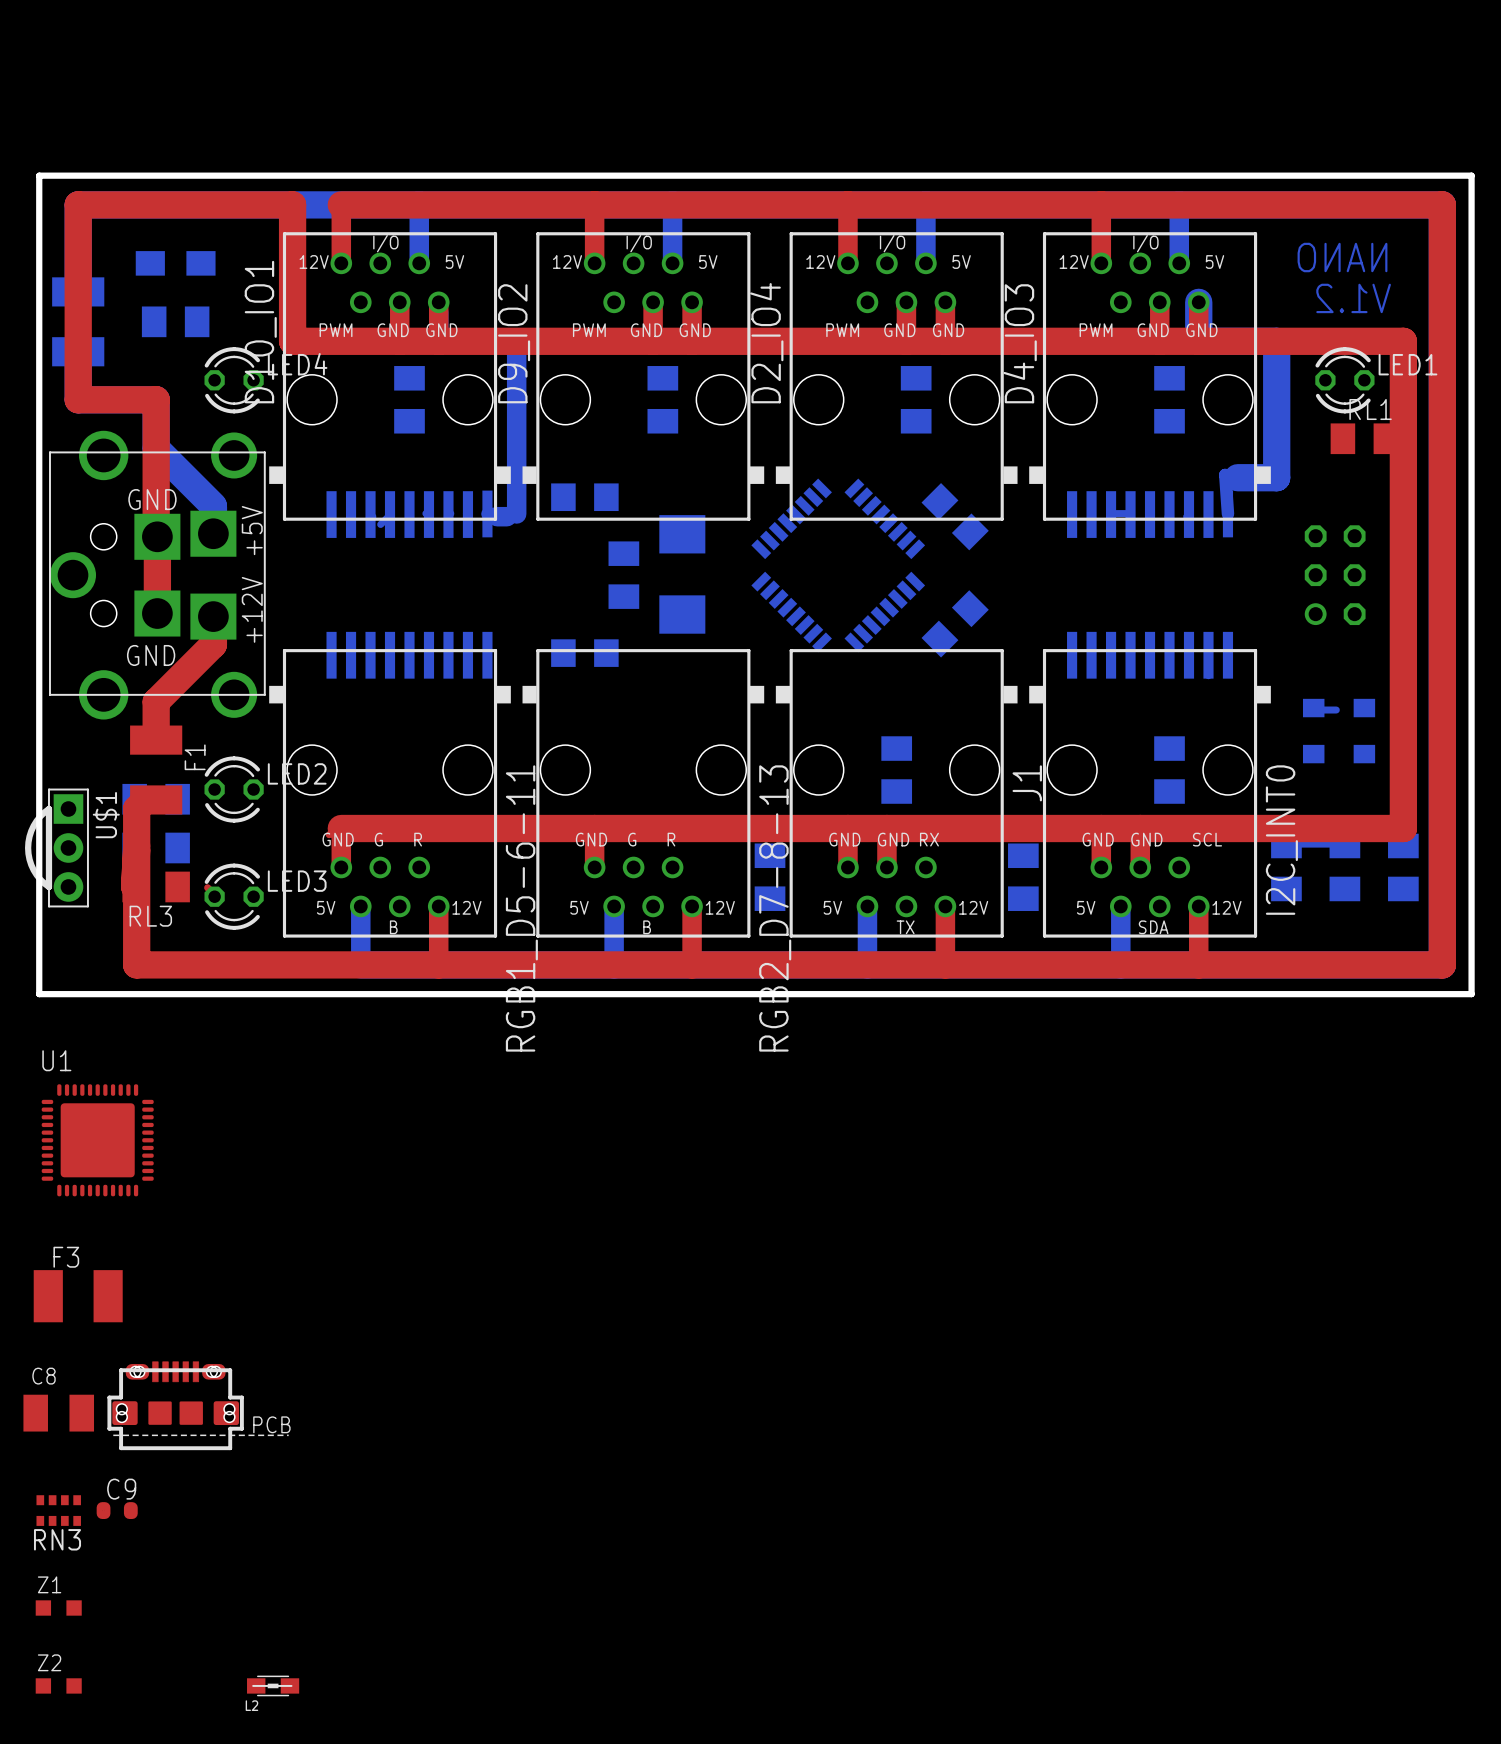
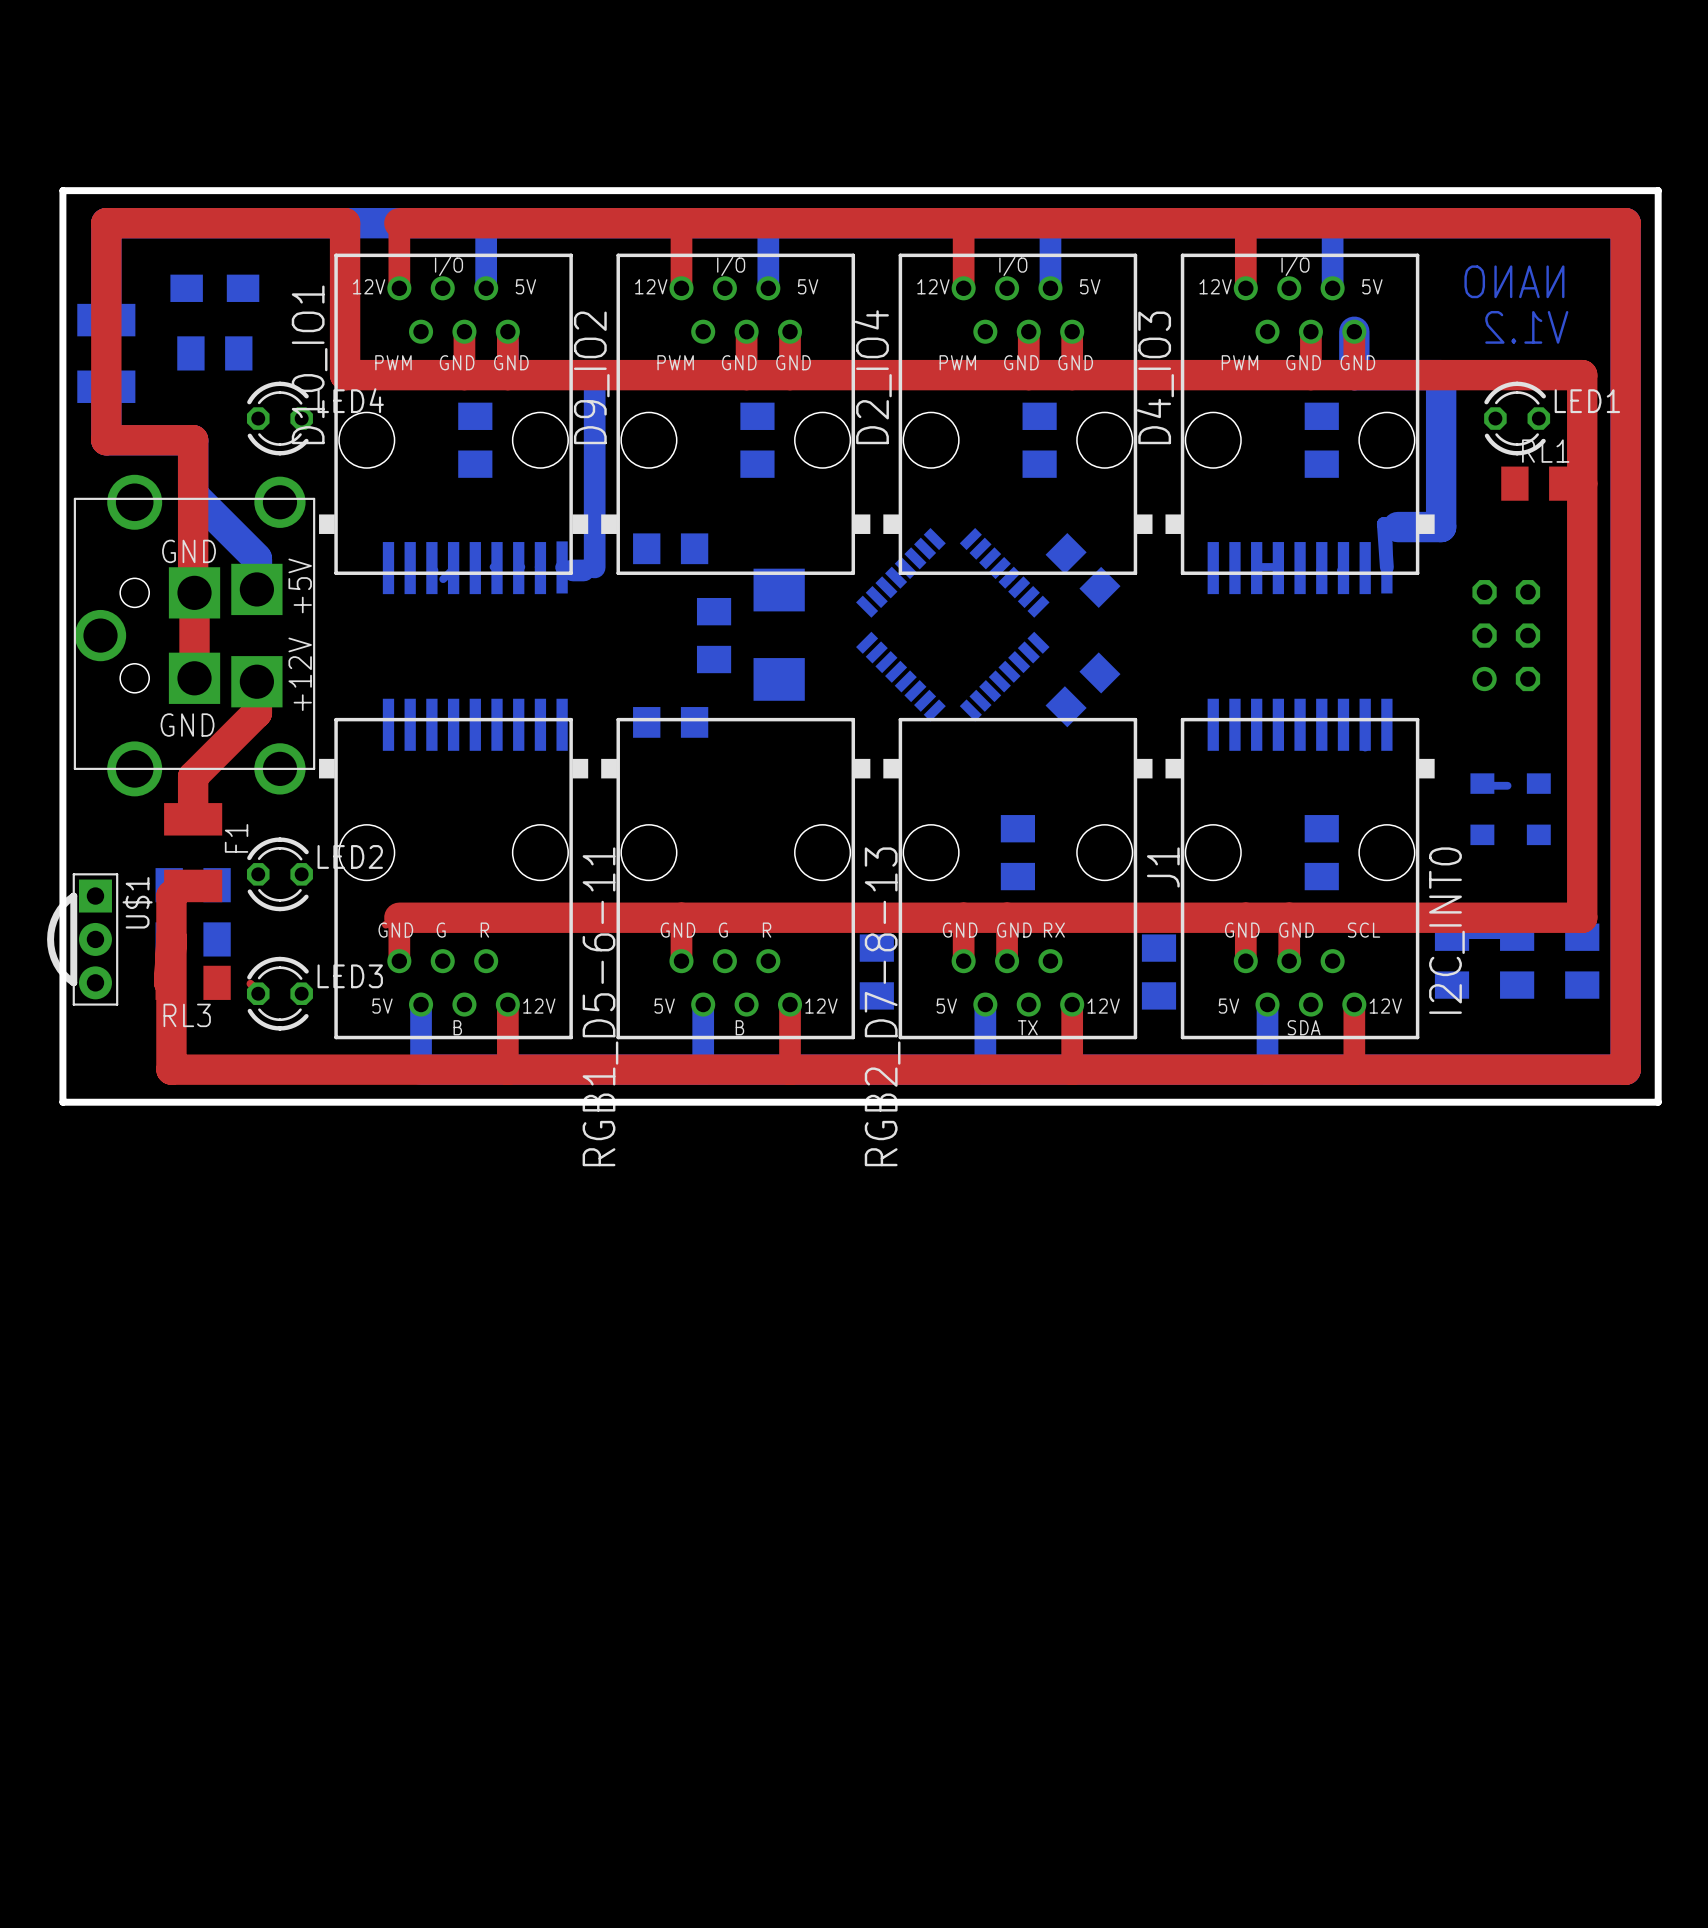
U1: (97, 1140) -> none
F3: (78, 1296) -> none
part: (198, 1405) -> none
C8: (58, 1413) -> none
RN3: (58, 1510) -> none
C9: (117, 1510) -> none
Z1: (58, 1608) -> none
Z2: (58, 1685) -> none
L2: (273, 1685) -> none

